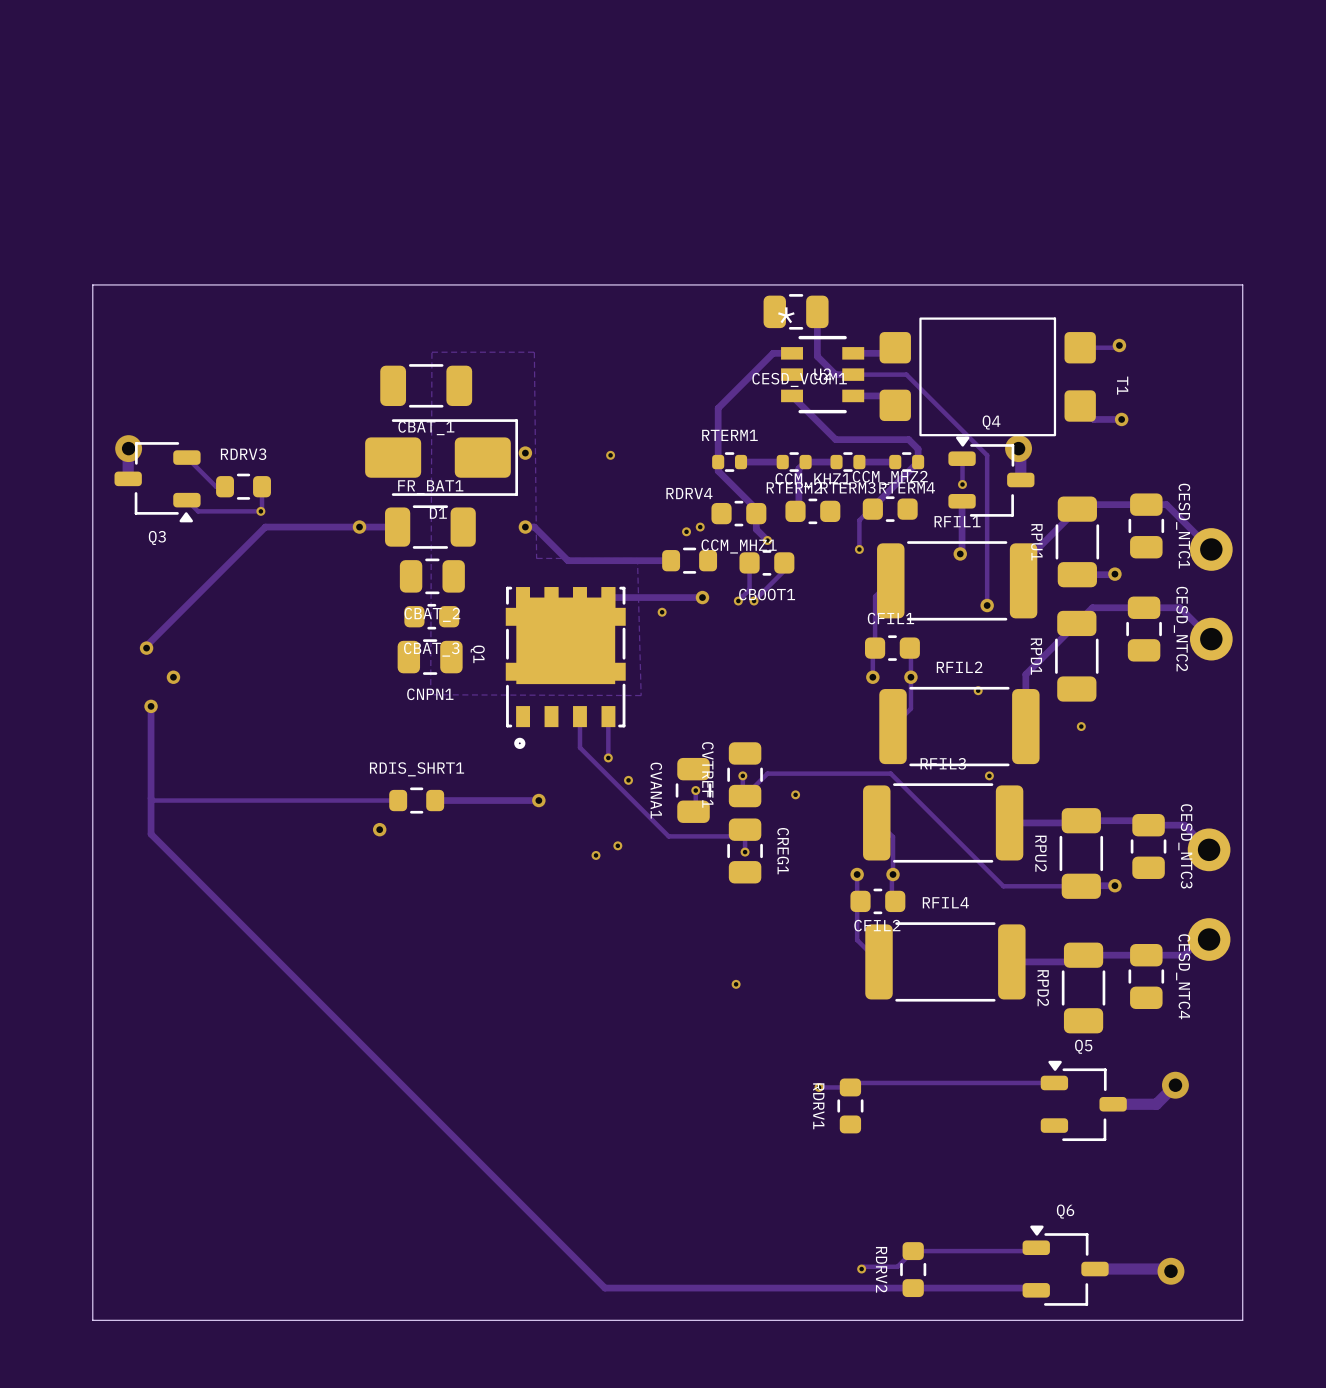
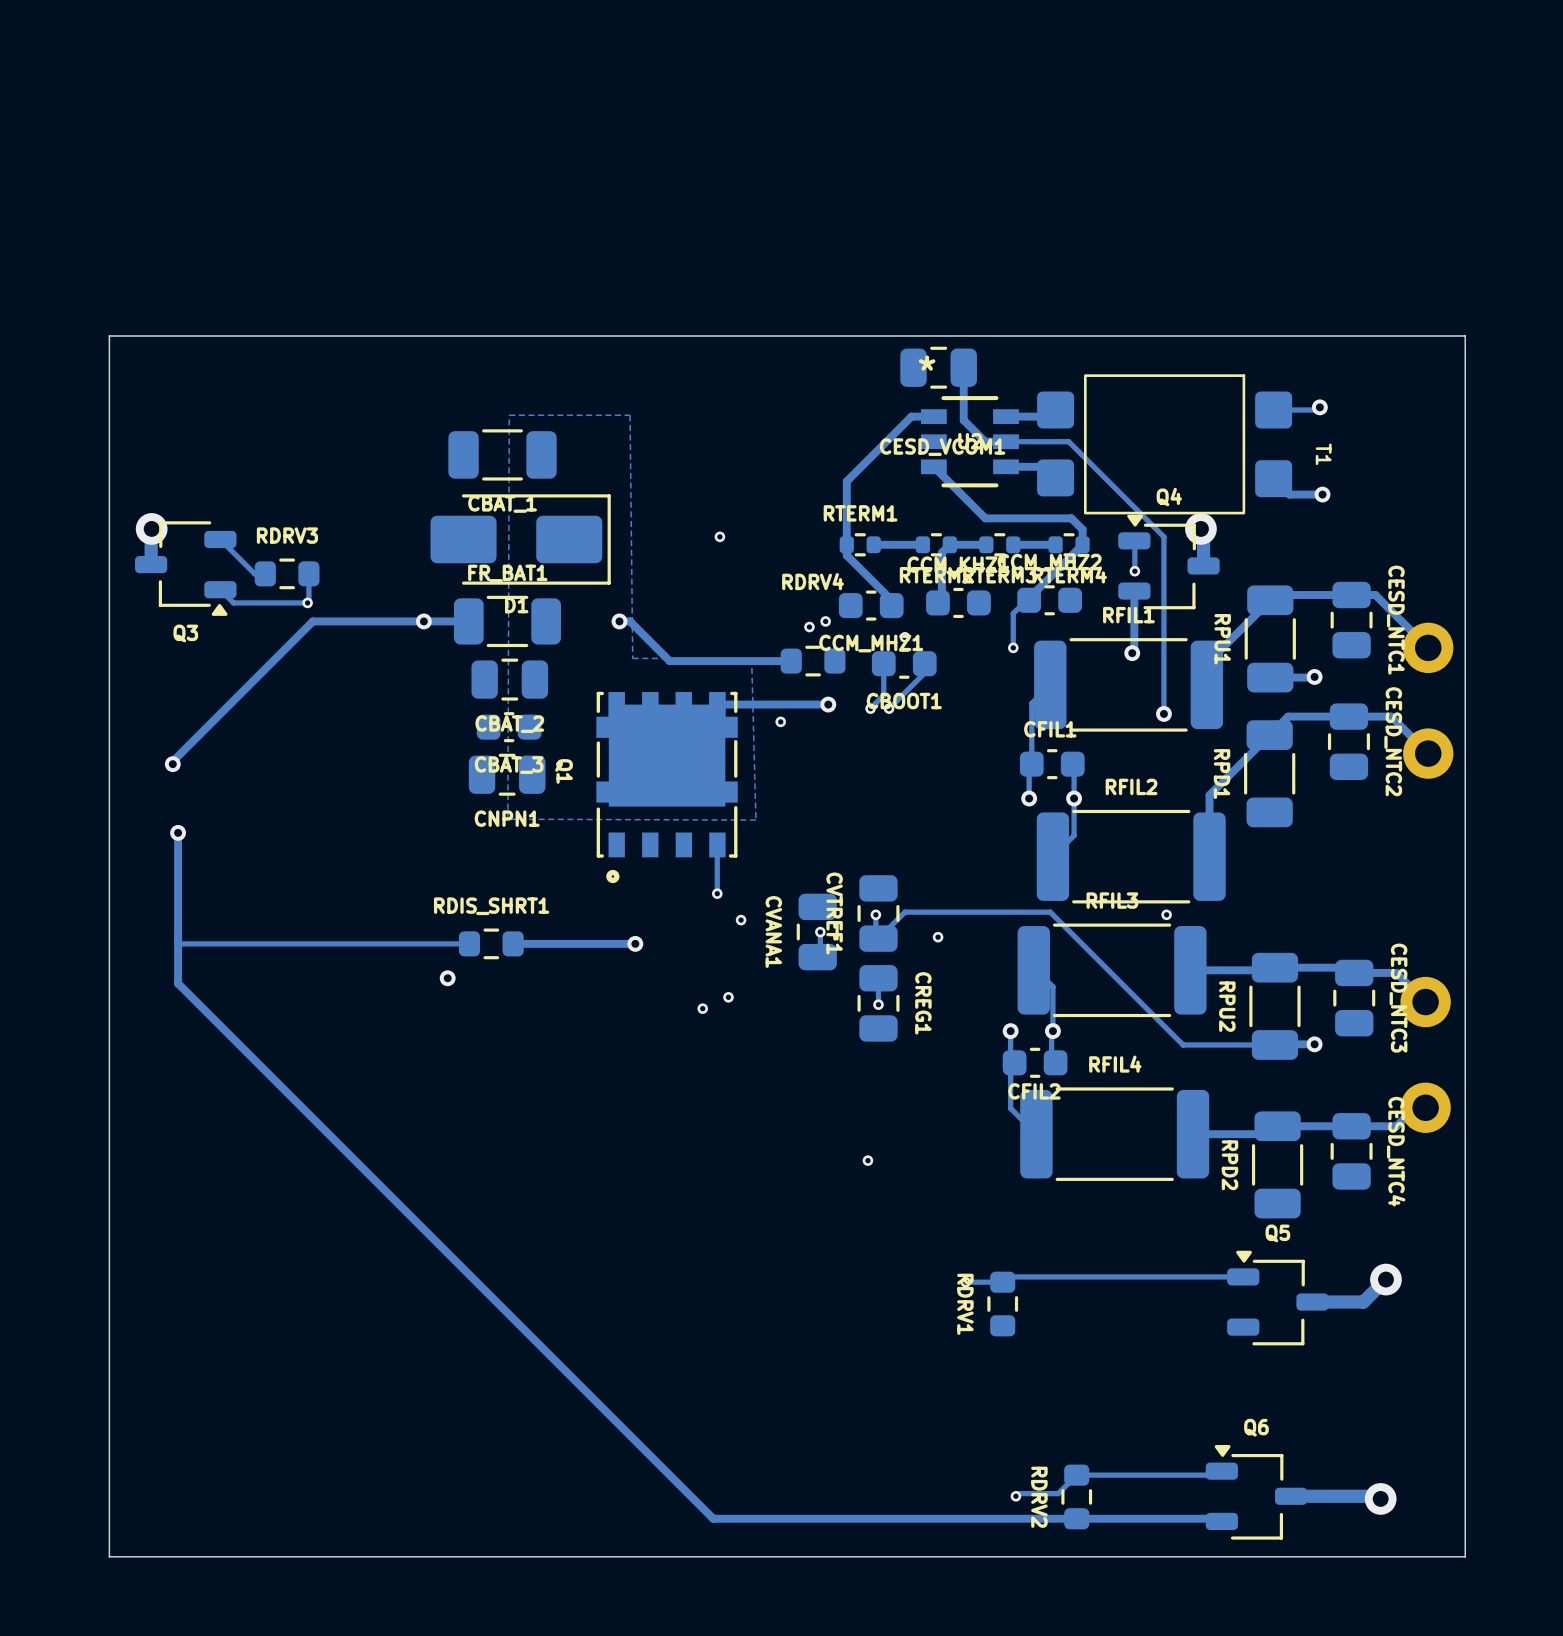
via: (525, 453) -> none
track: (756, 513) (756, 529) (767, 540) -> none
via: (173, 677) -> none
via: (978, 690) -> none
track: (579, 716) (579, 747) (668, 836) (738, 836) (745, 829) -> none
via: (1081, 726) -> none

